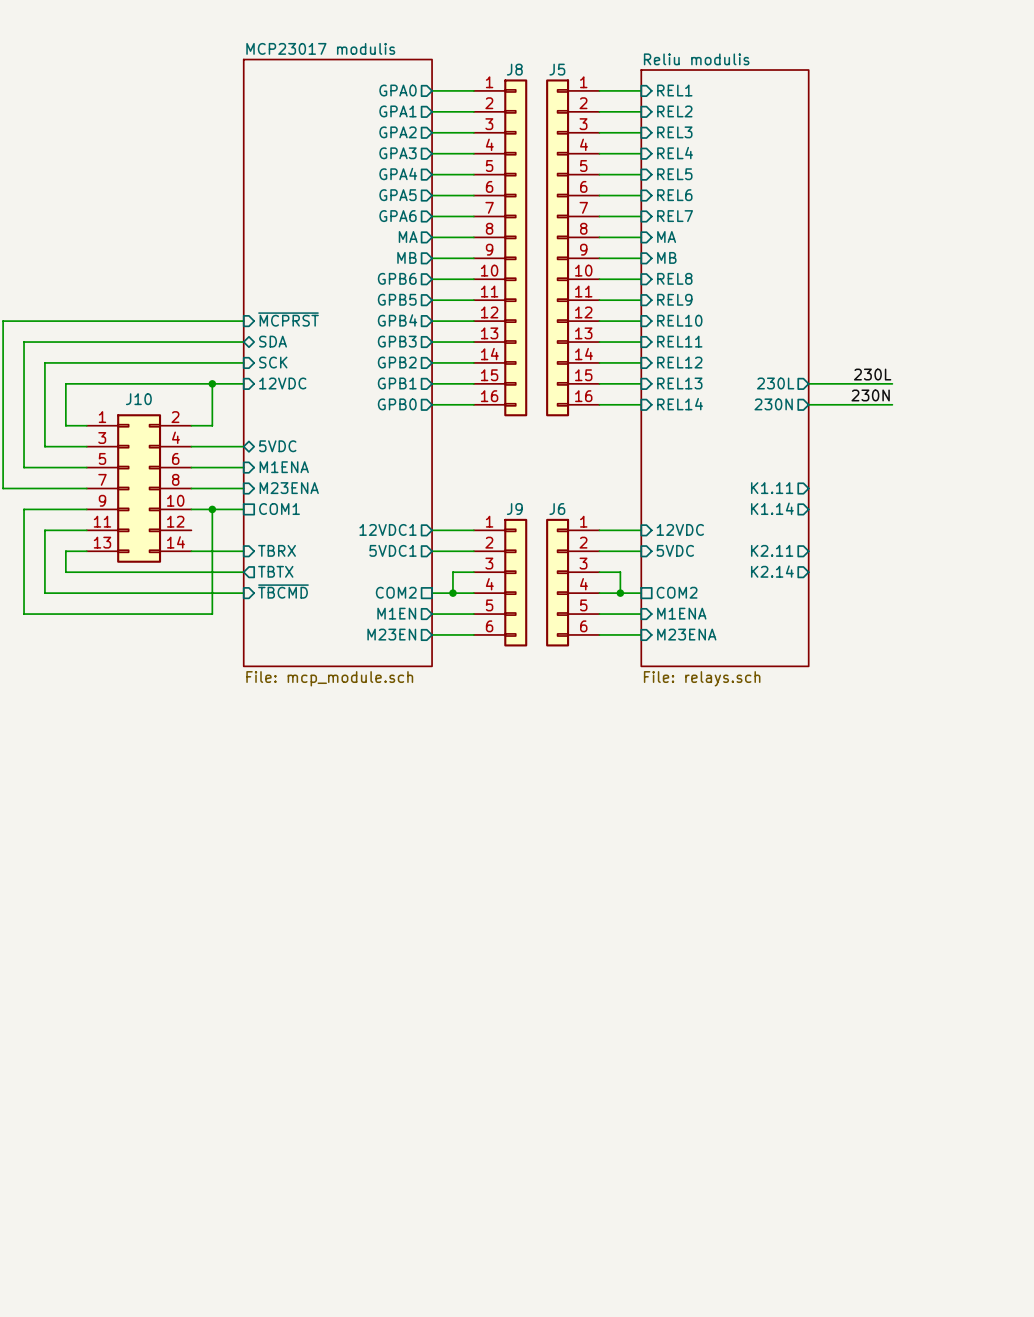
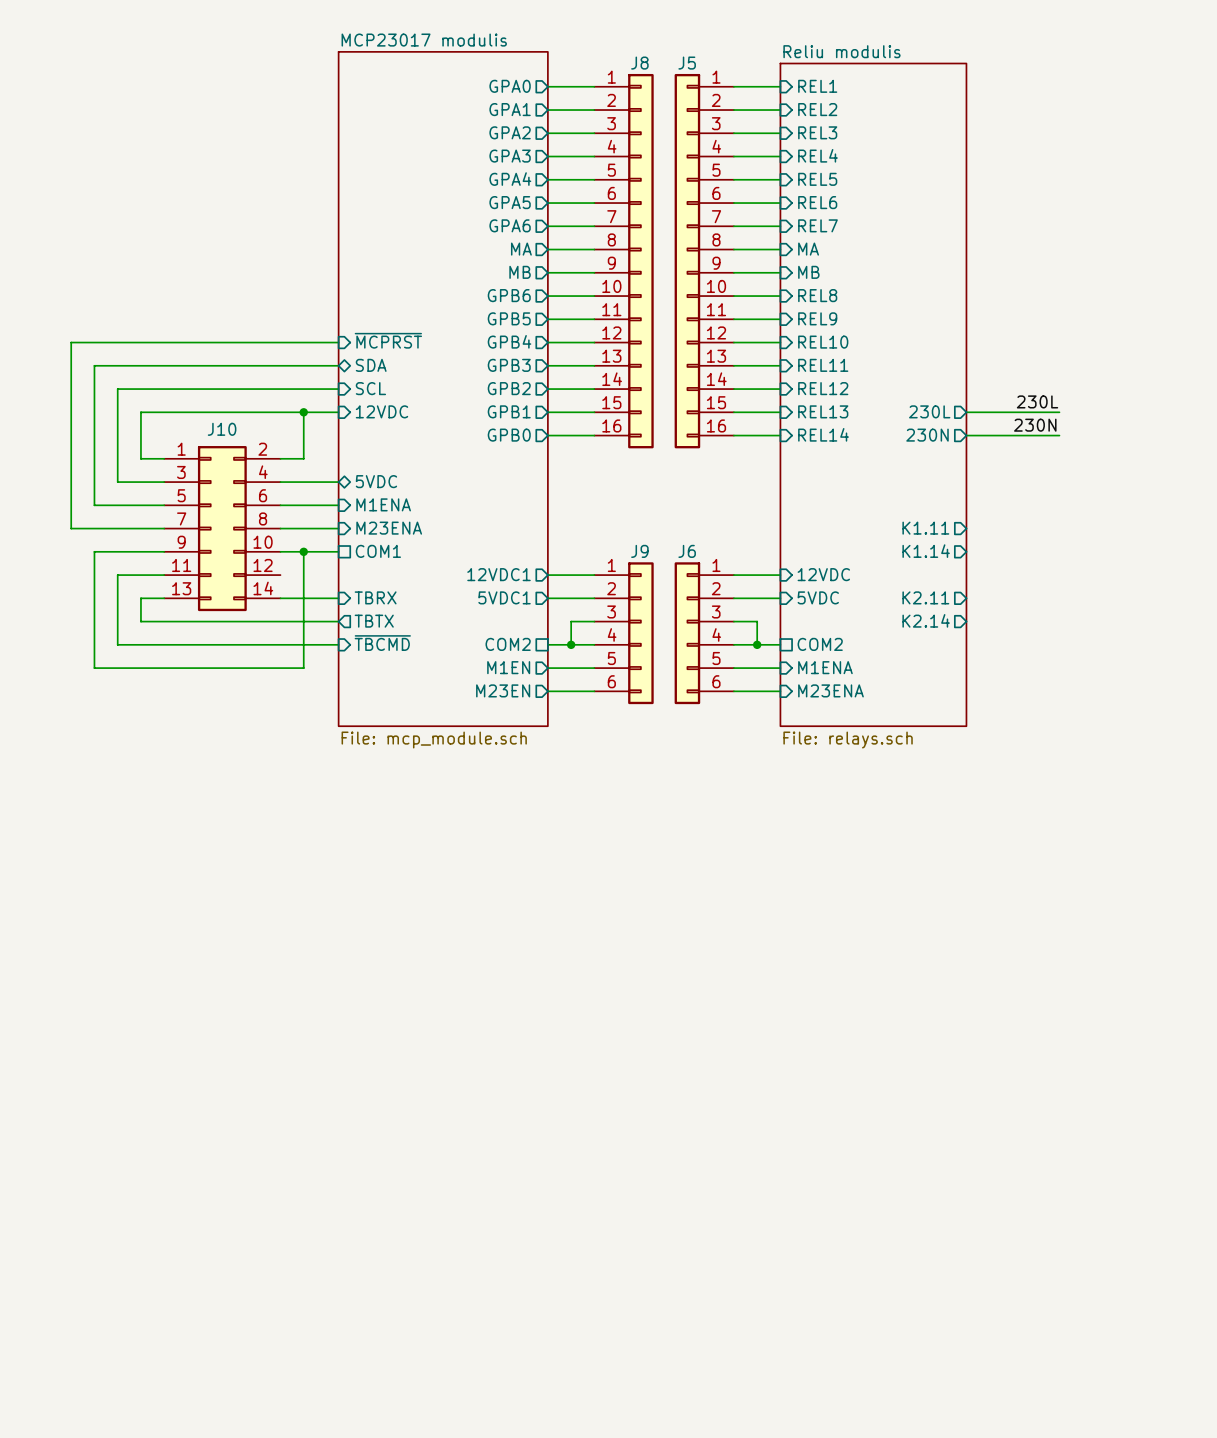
sheet pin: SCK (273, 362) -> SCL (370, 388)

